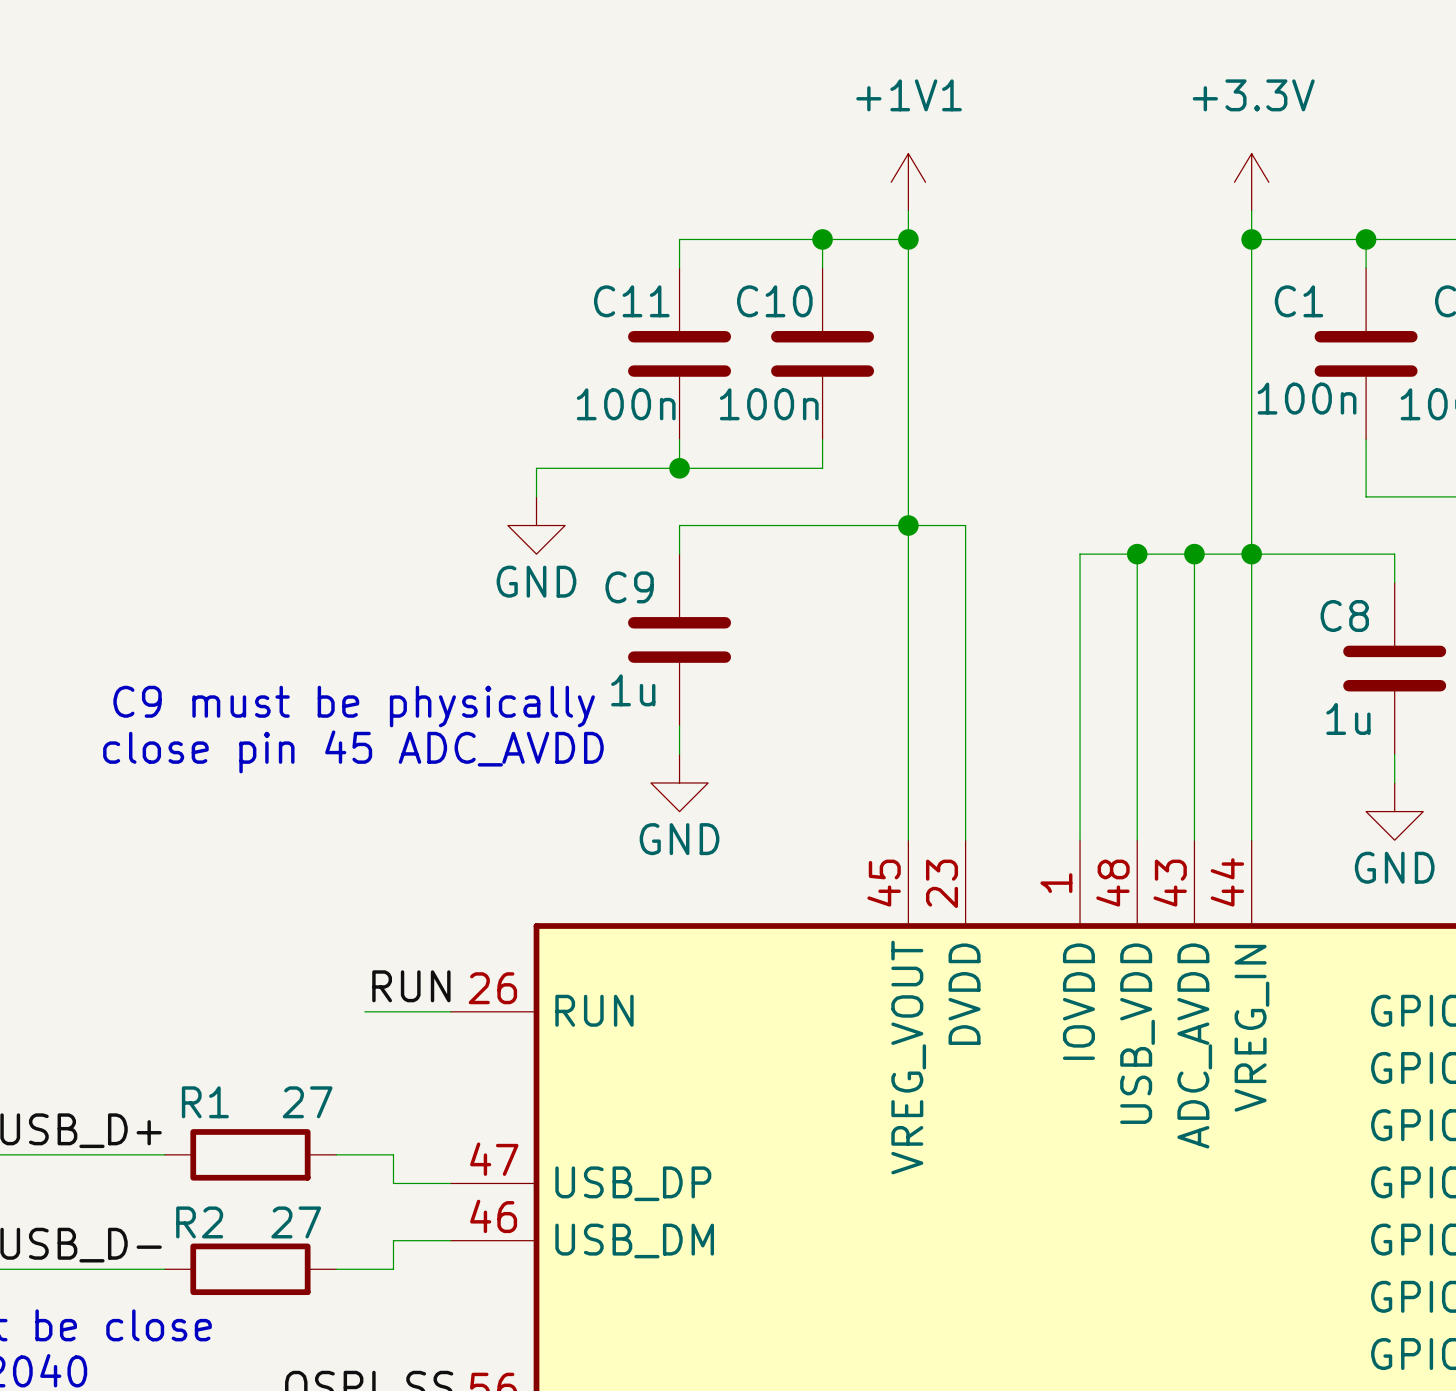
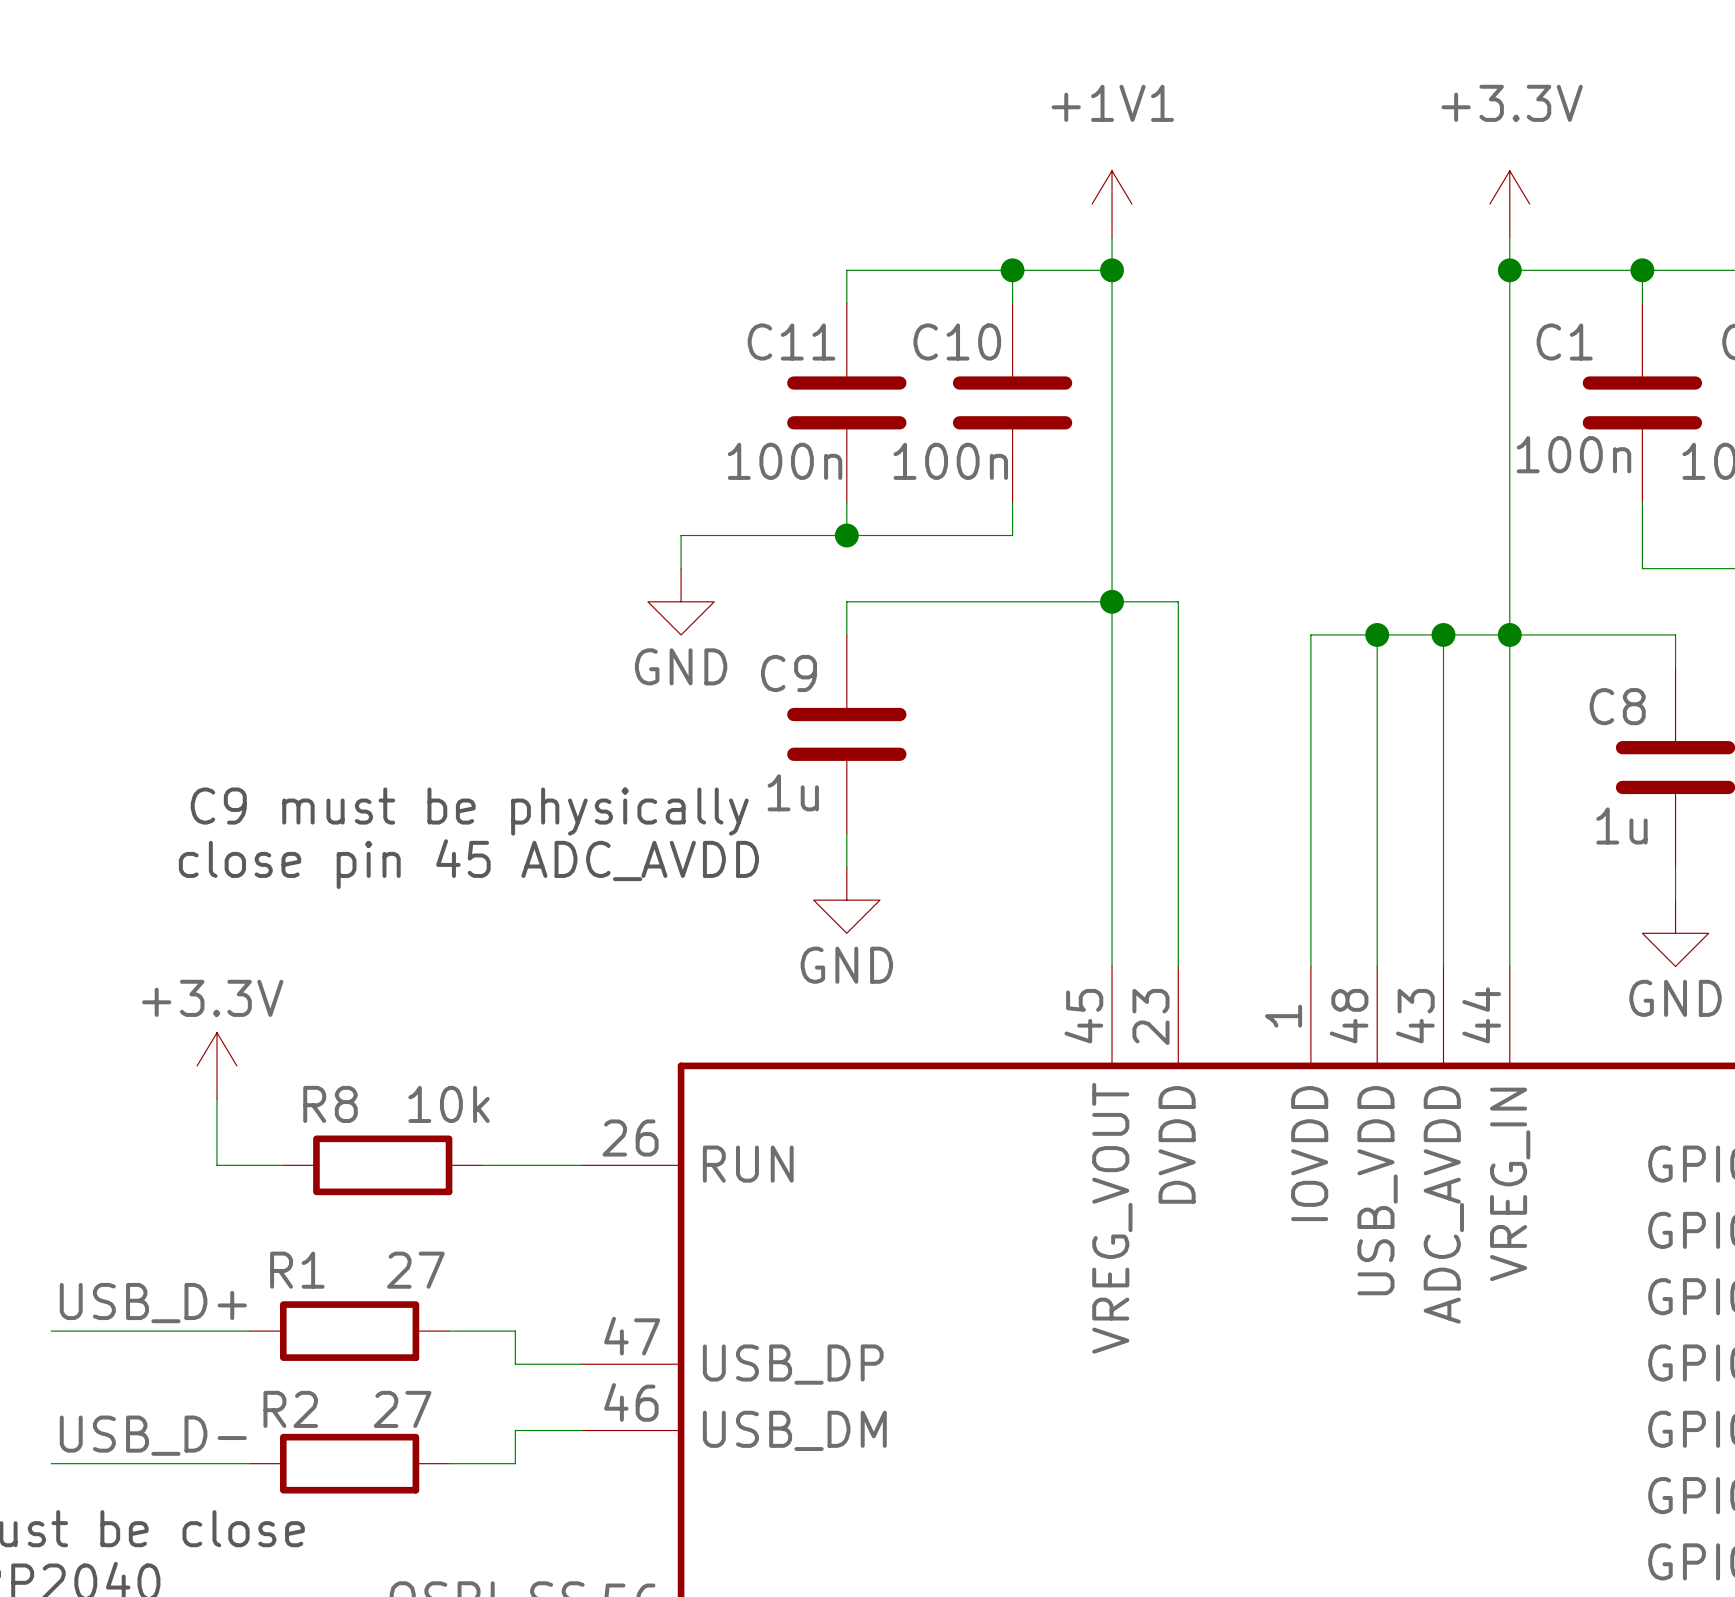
power symbol: none -> +3.3V (216, 1065)
wire: none -> (216, 1099) (216, 1165) (283, 1165)
label: RUN (411, 986) -> none
R8: none -> 10k (382, 1165)

